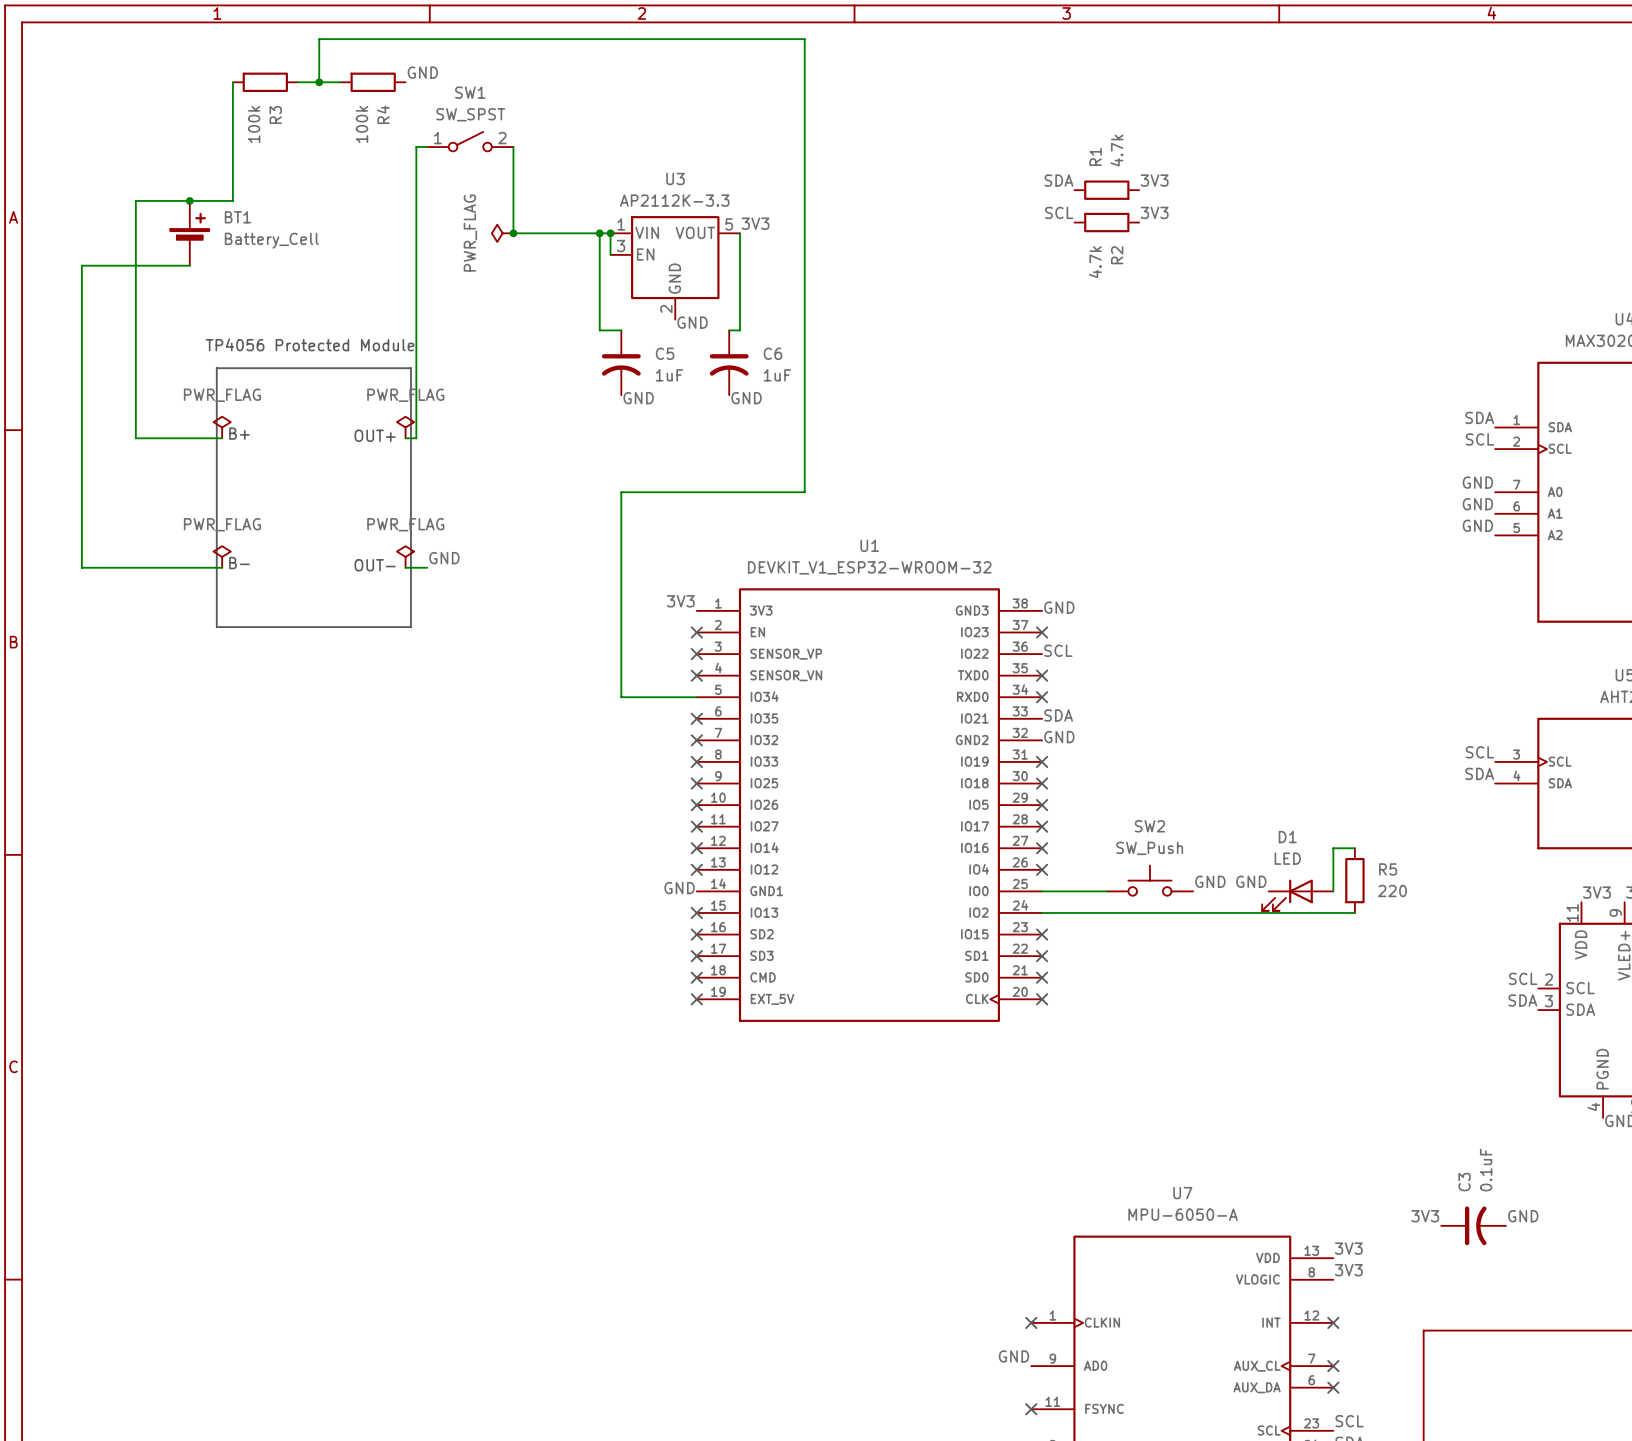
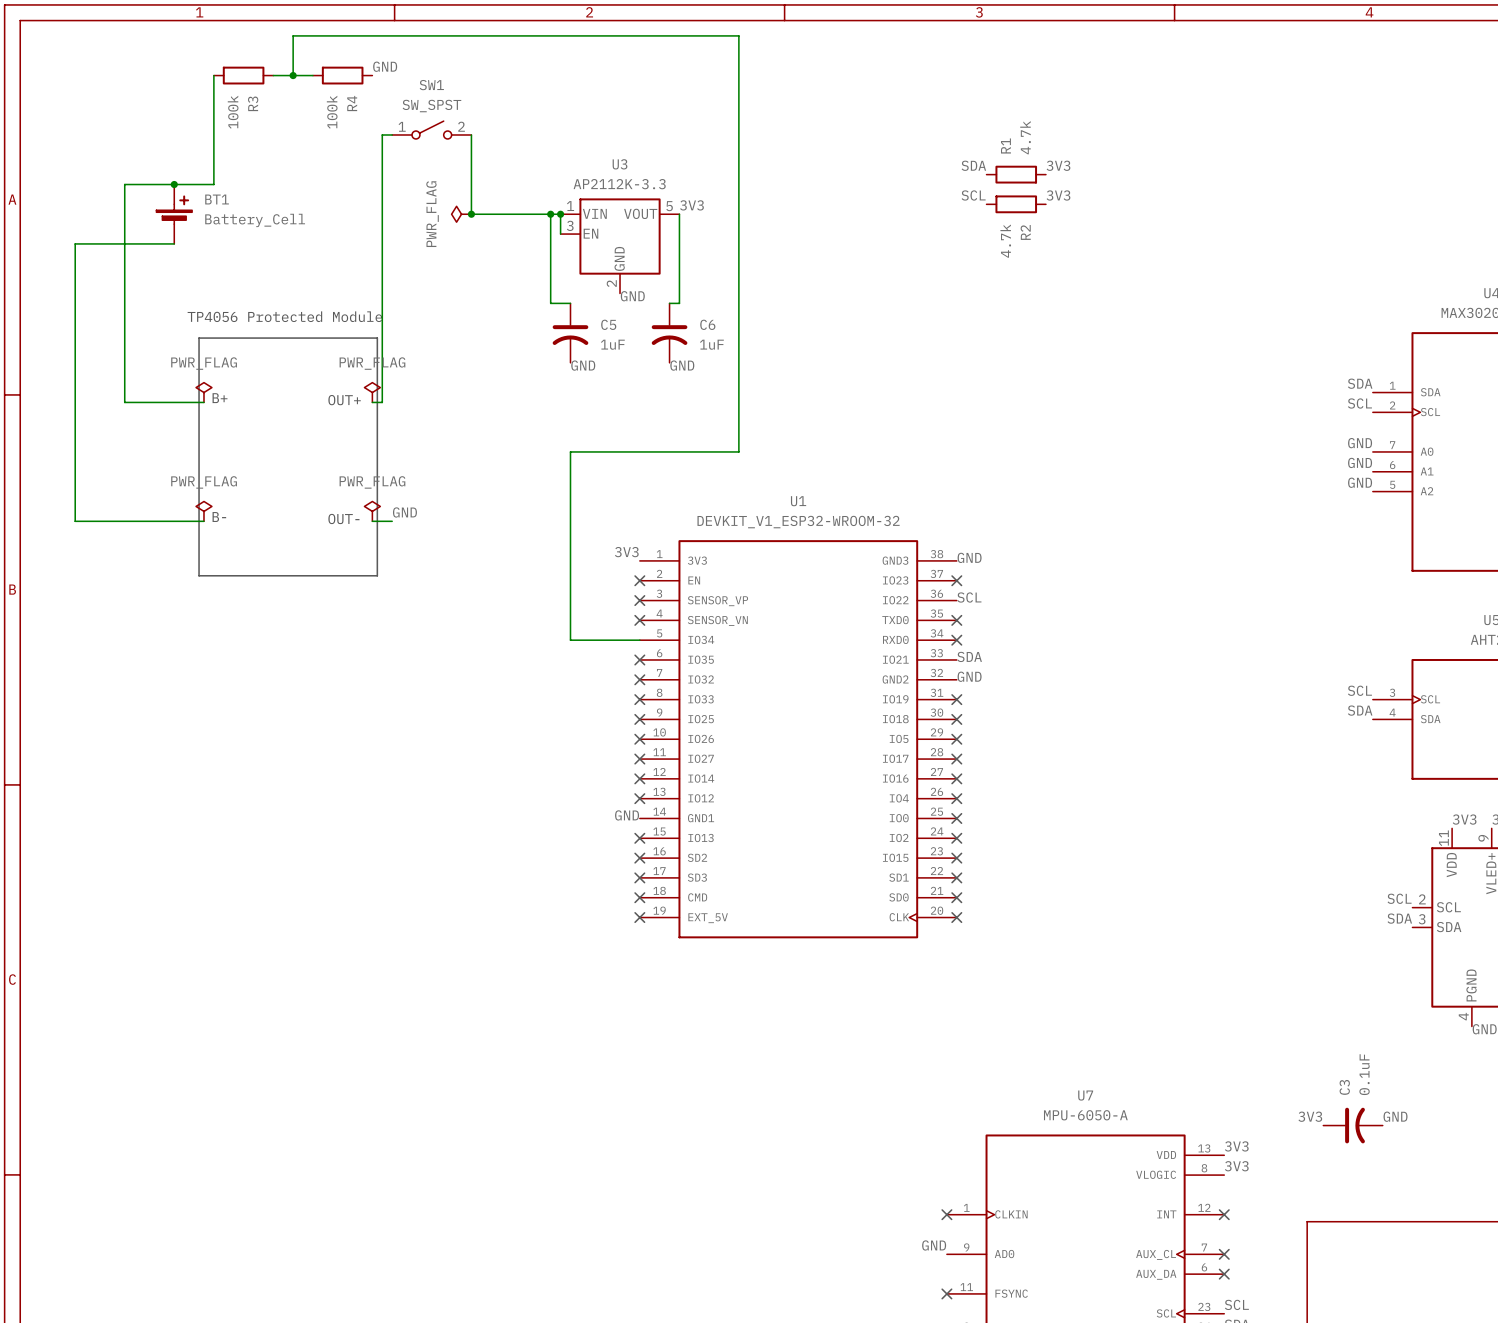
wire: (1354, 848) (1333, 848) (1333, 891) -> none
SW2: SW_Push (1149, 880) -> none
R5: 220 (1354, 880) -> none
label: GND (1210, 881) -> none
label: GND (1251, 881) -> none
wire: (1042, 891) (1106, 891) -> none
no-connect mark: none -> (956, 818)
D1: LED (1297, 895) -> none
wire: (1042, 912) (1354, 912) -> none
no-connect mark: none -> (956, 838)

